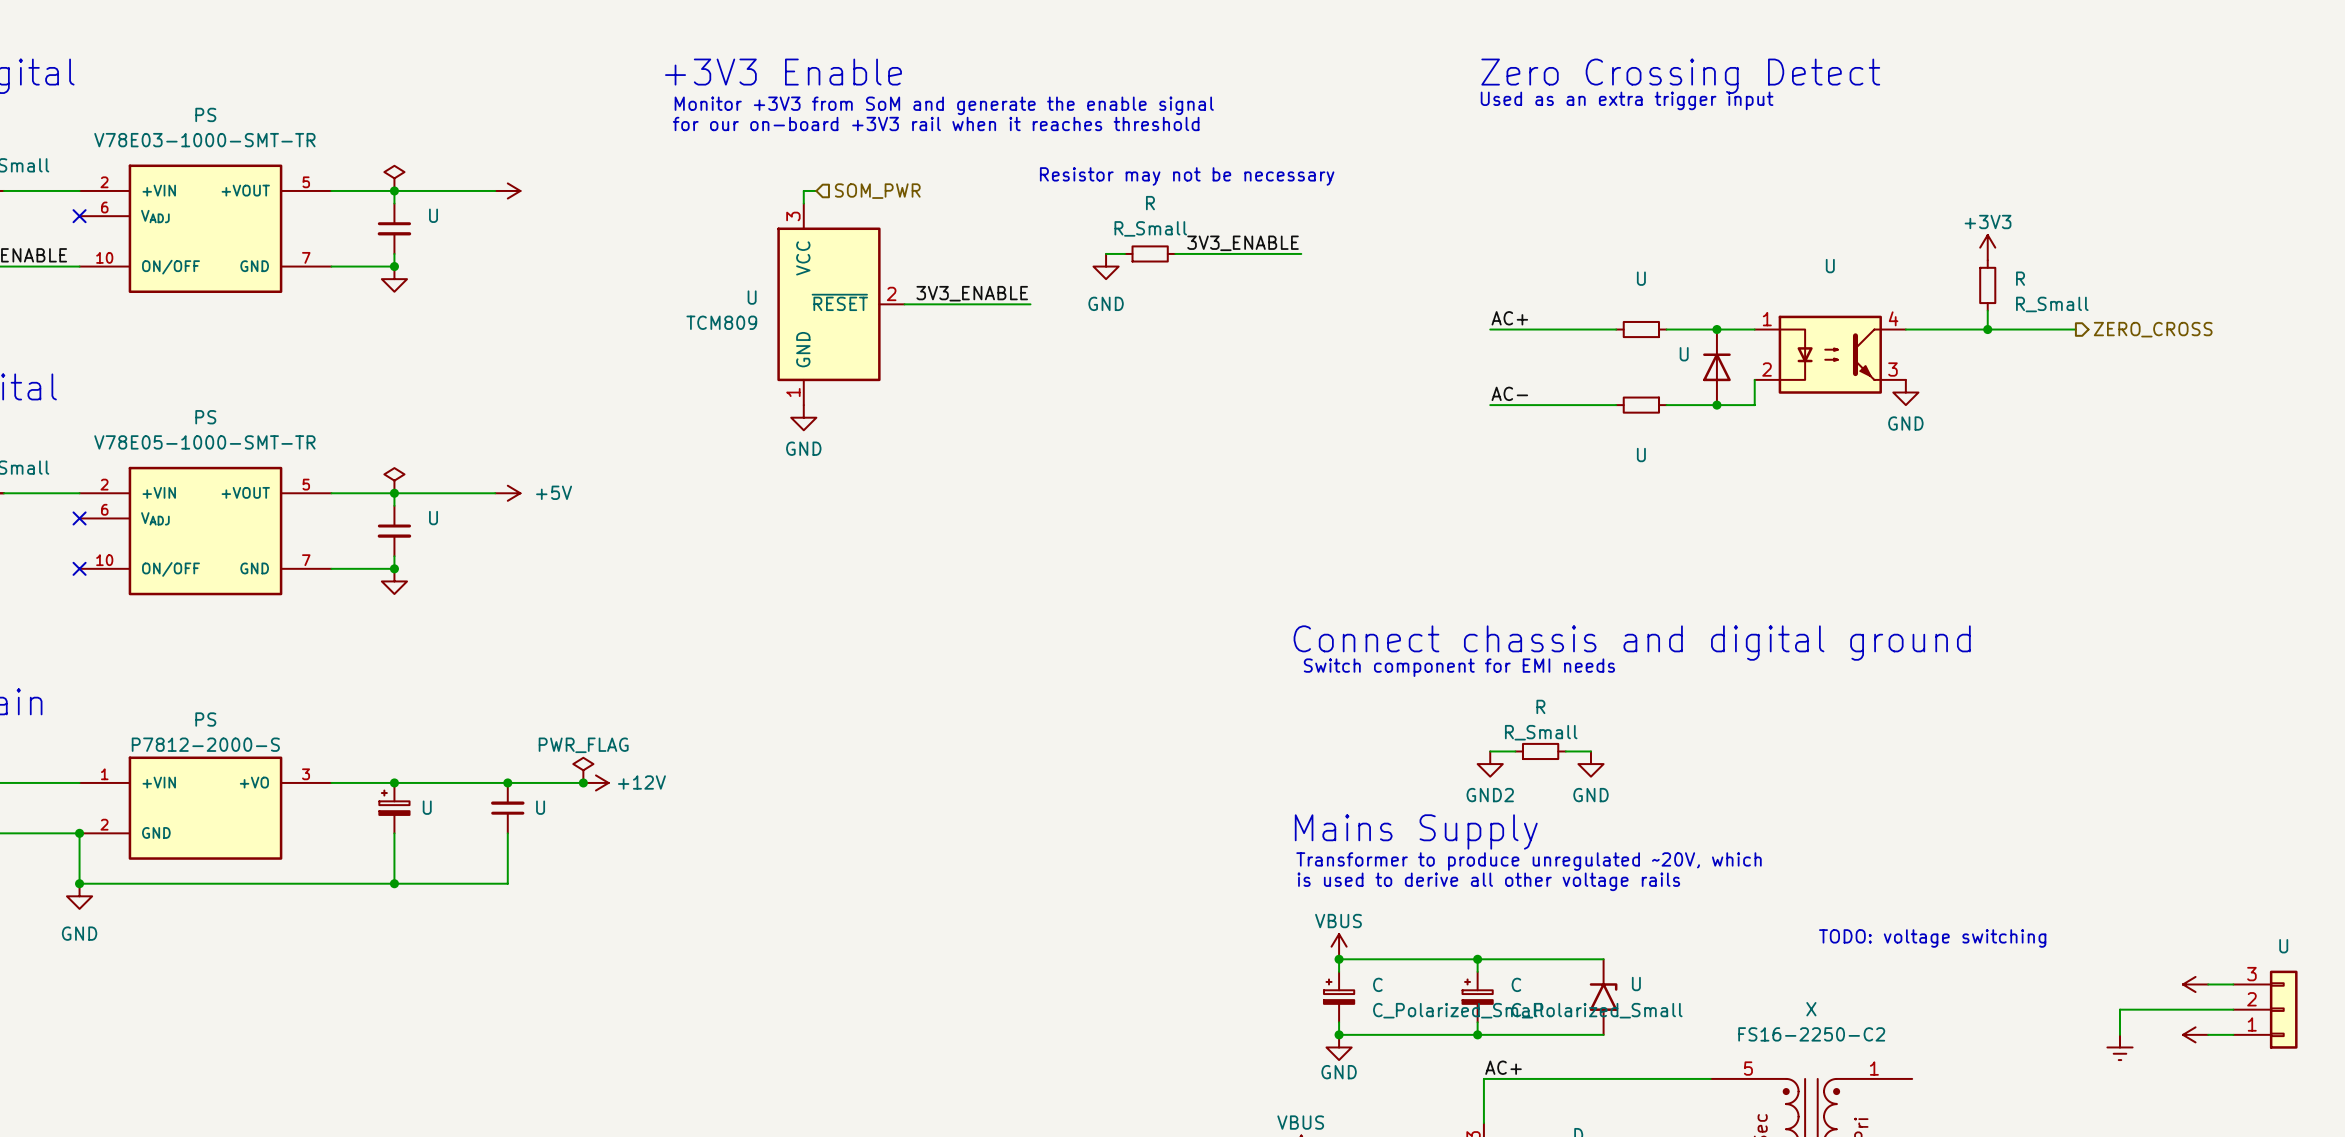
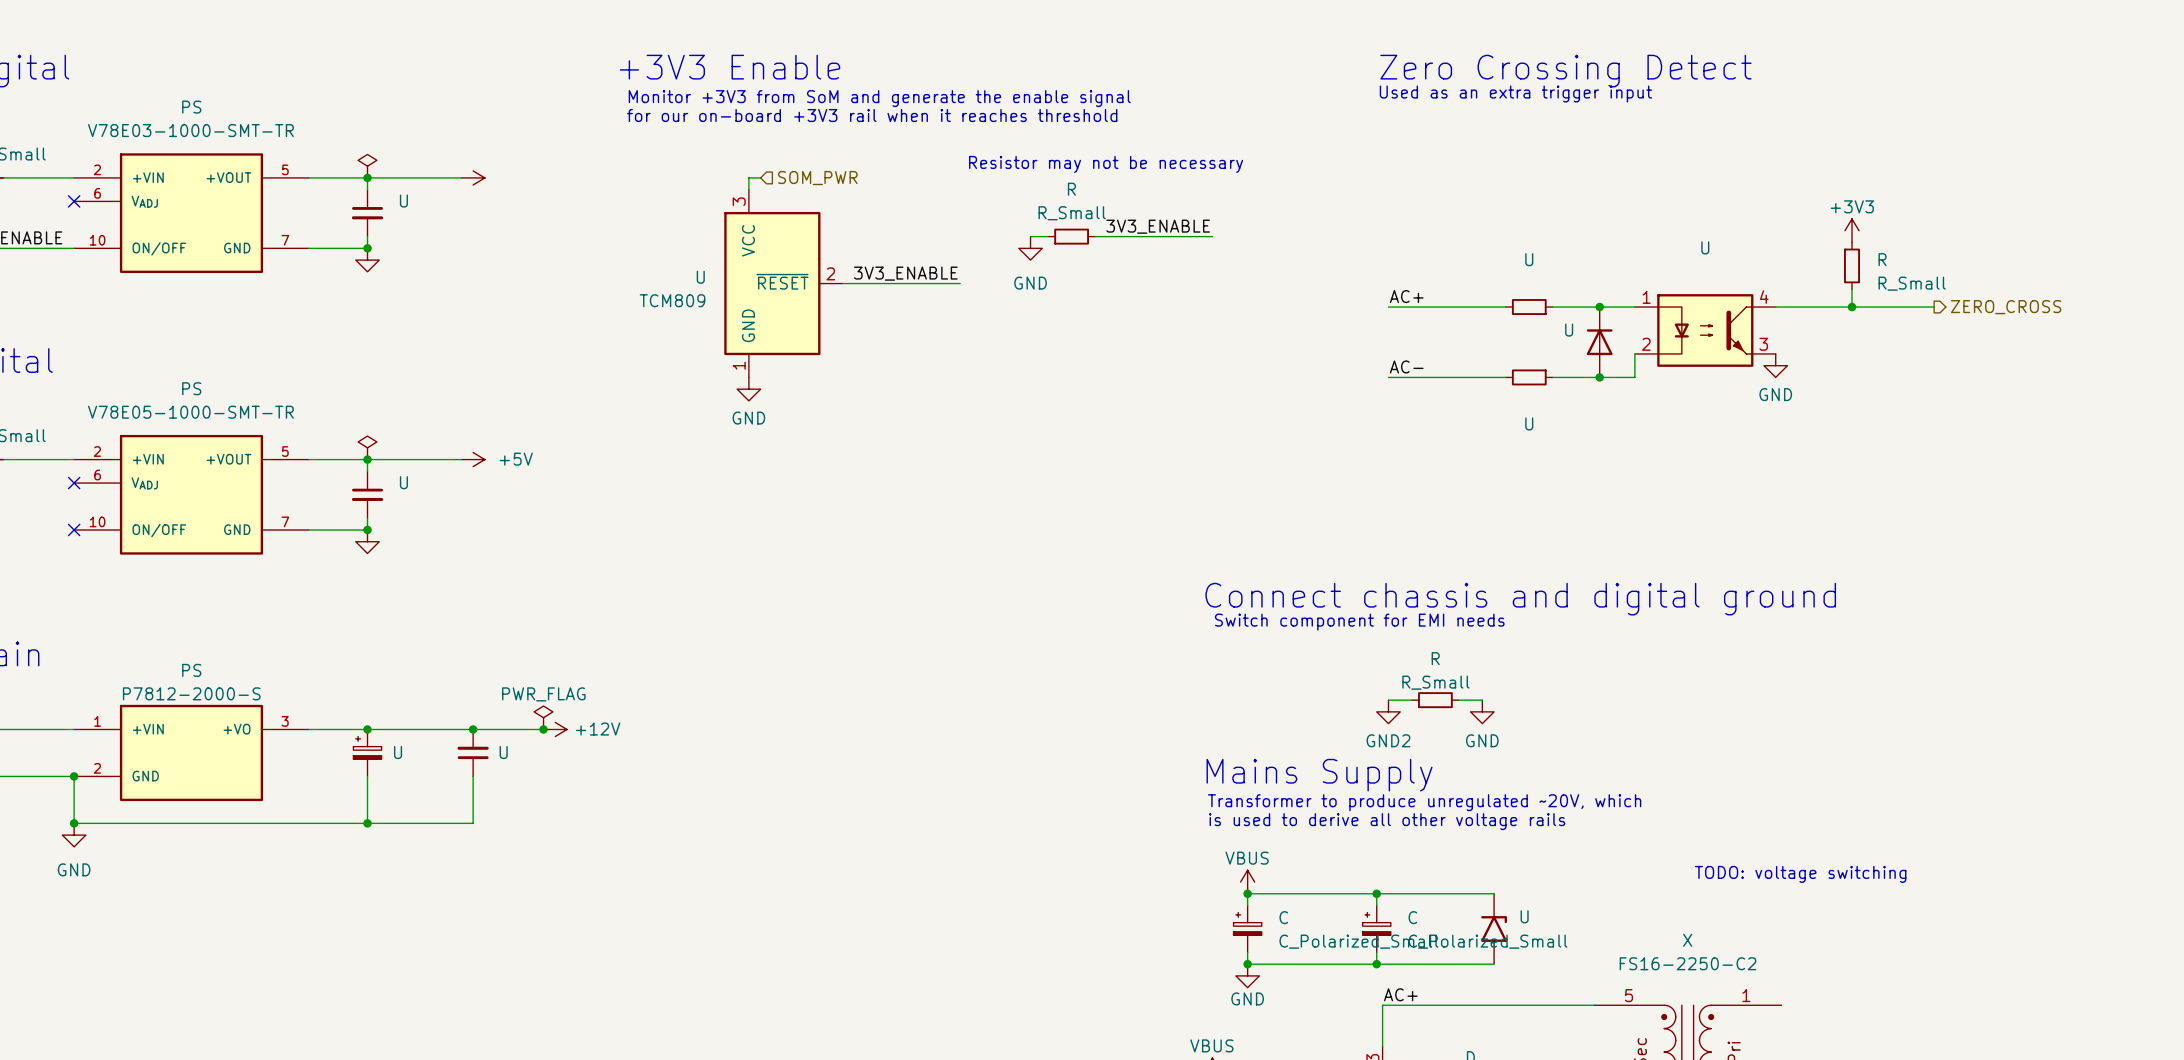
power symbol: (2195, 984) -> none
wire: (2208, 984) (2233, 984) -> none
wire: (2233, 1009) (2119, 1009) (2119, 1034) -> none
U: (2265, 1009) -> none
power symbol: (2195, 1034) -> none
wire: (2208, 1034) (2233, 1034) -> none
power symbol: (2119, 1047) -> none

